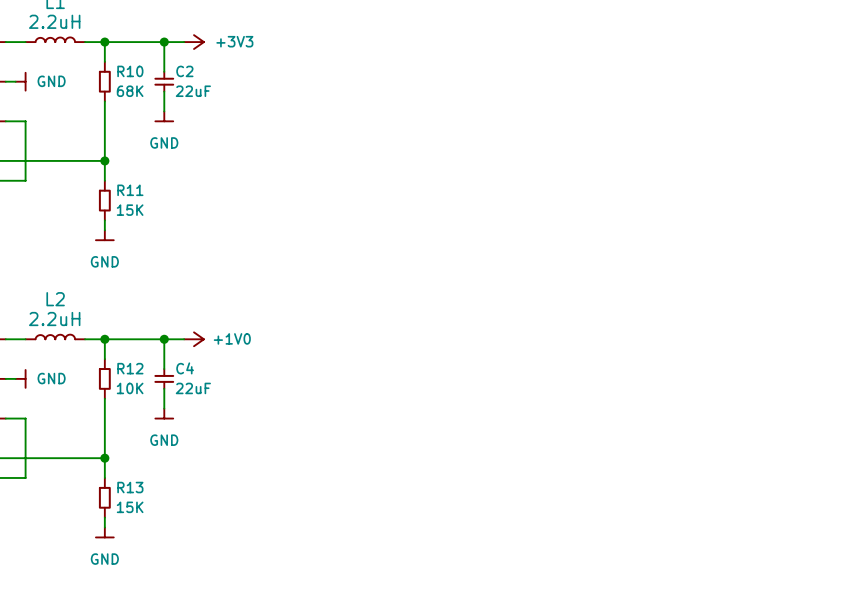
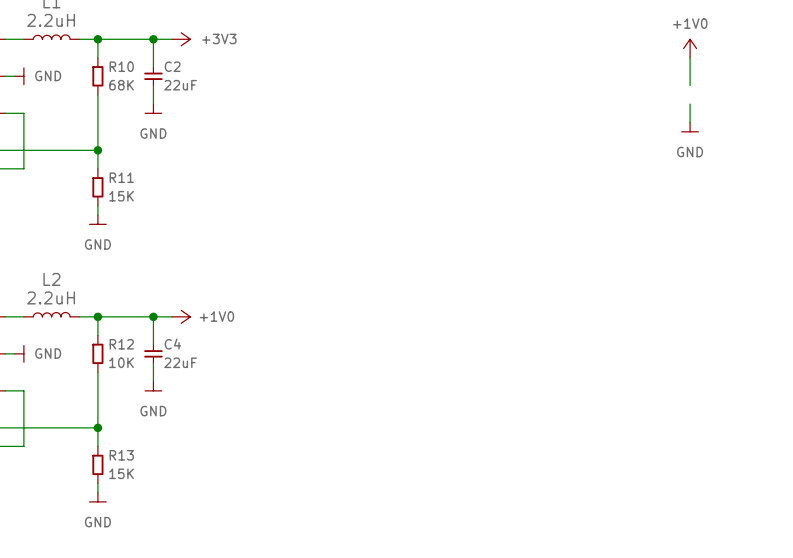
power symbol: none -> +1V0 (690, 48)
wire: none -> (690, 57) (690, 85)
wire: none -> (690, 104) (690, 122)
power symbol: none -> GND (690, 127)

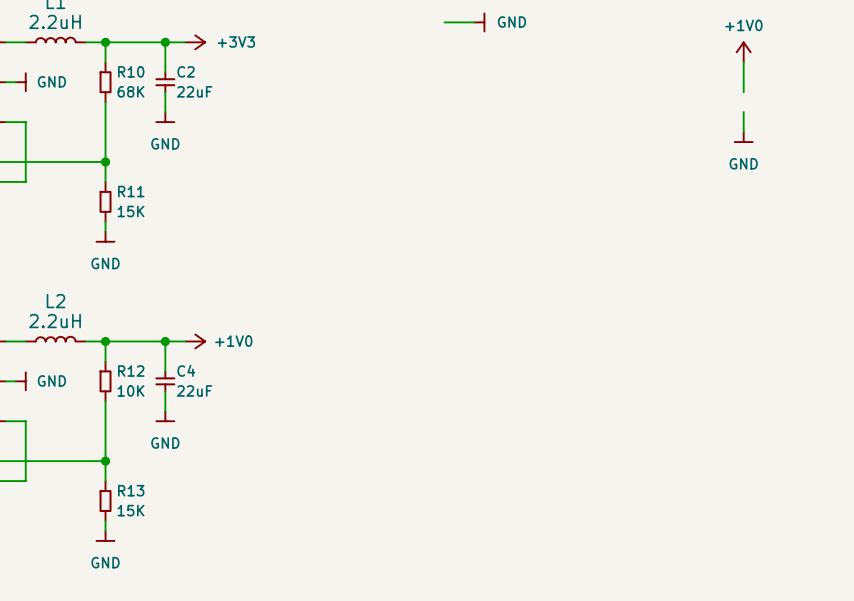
wire: none -> (444, 22) (474, 22)
power symbol: none -> GND (479, 22)

